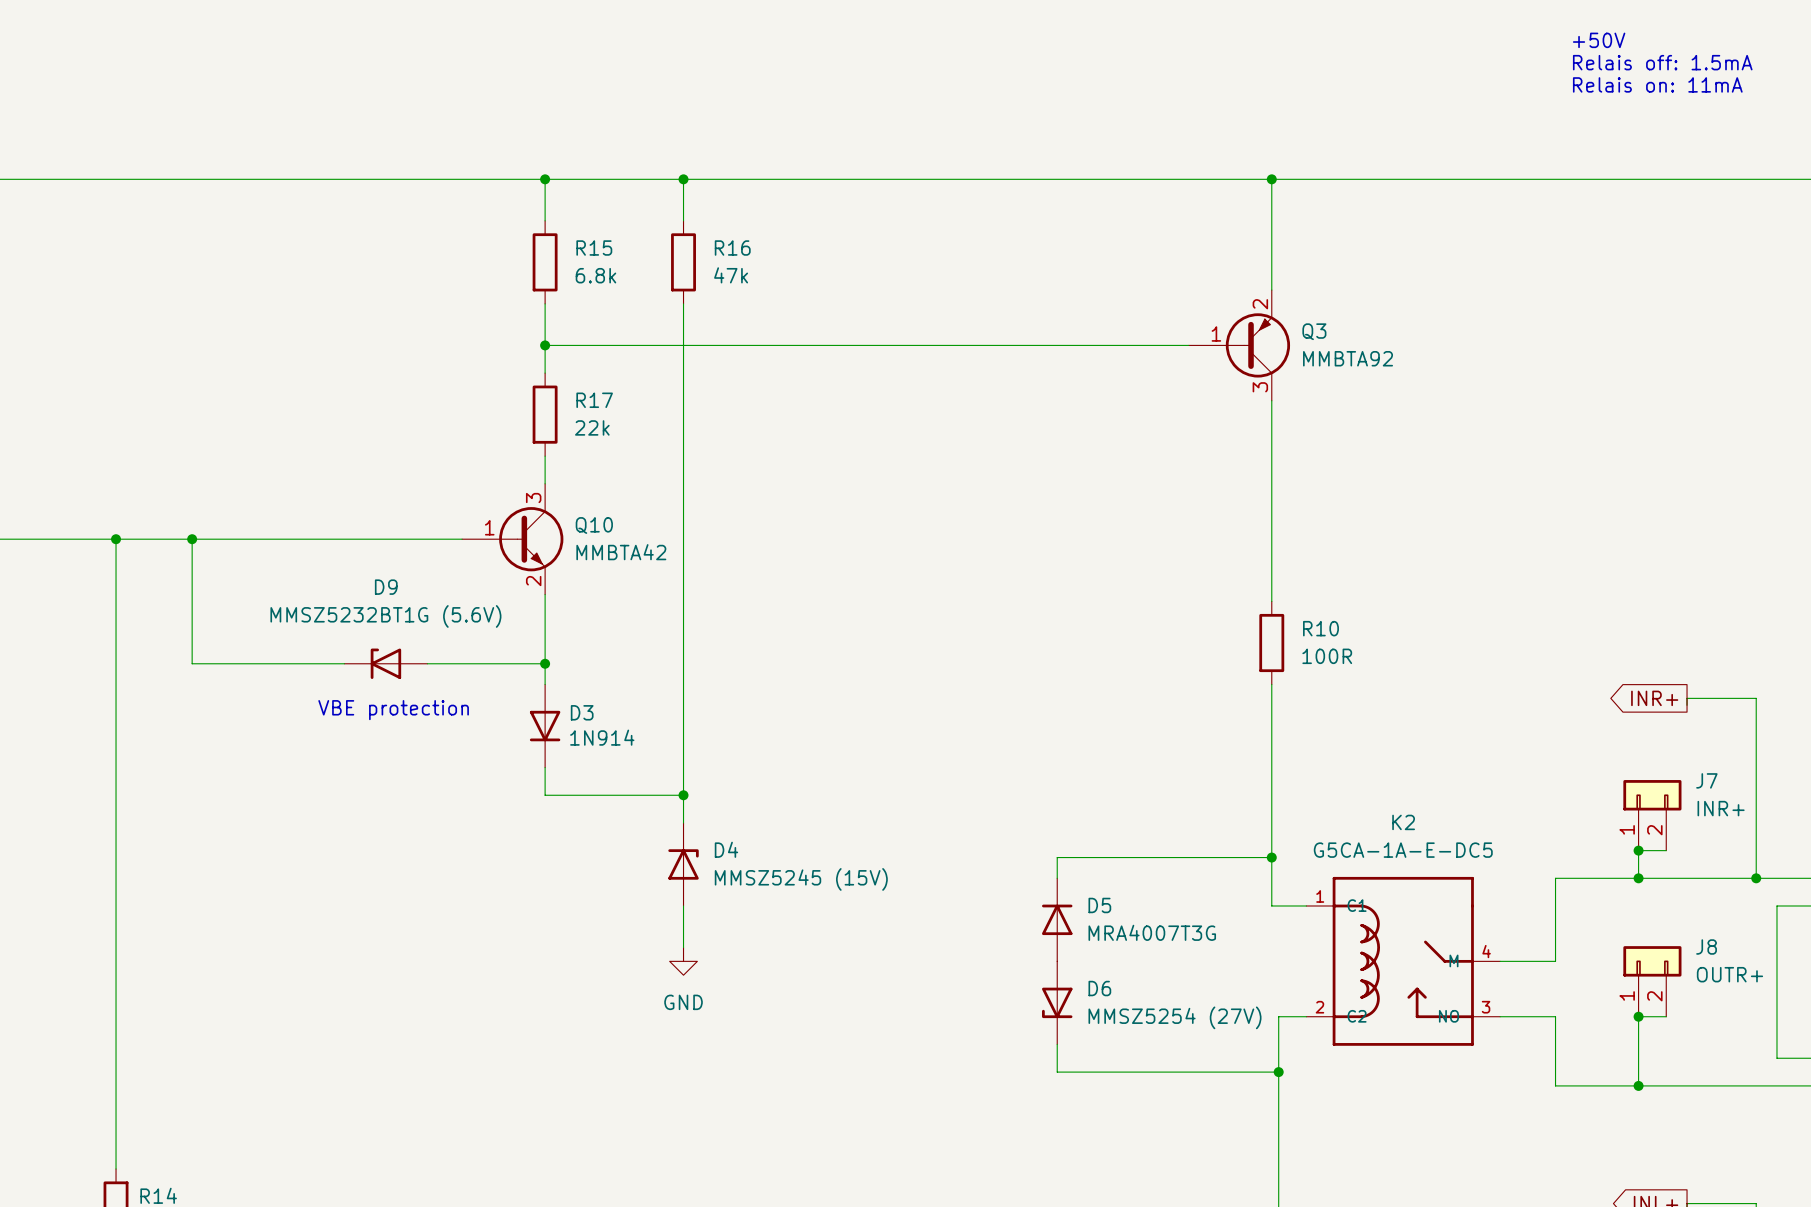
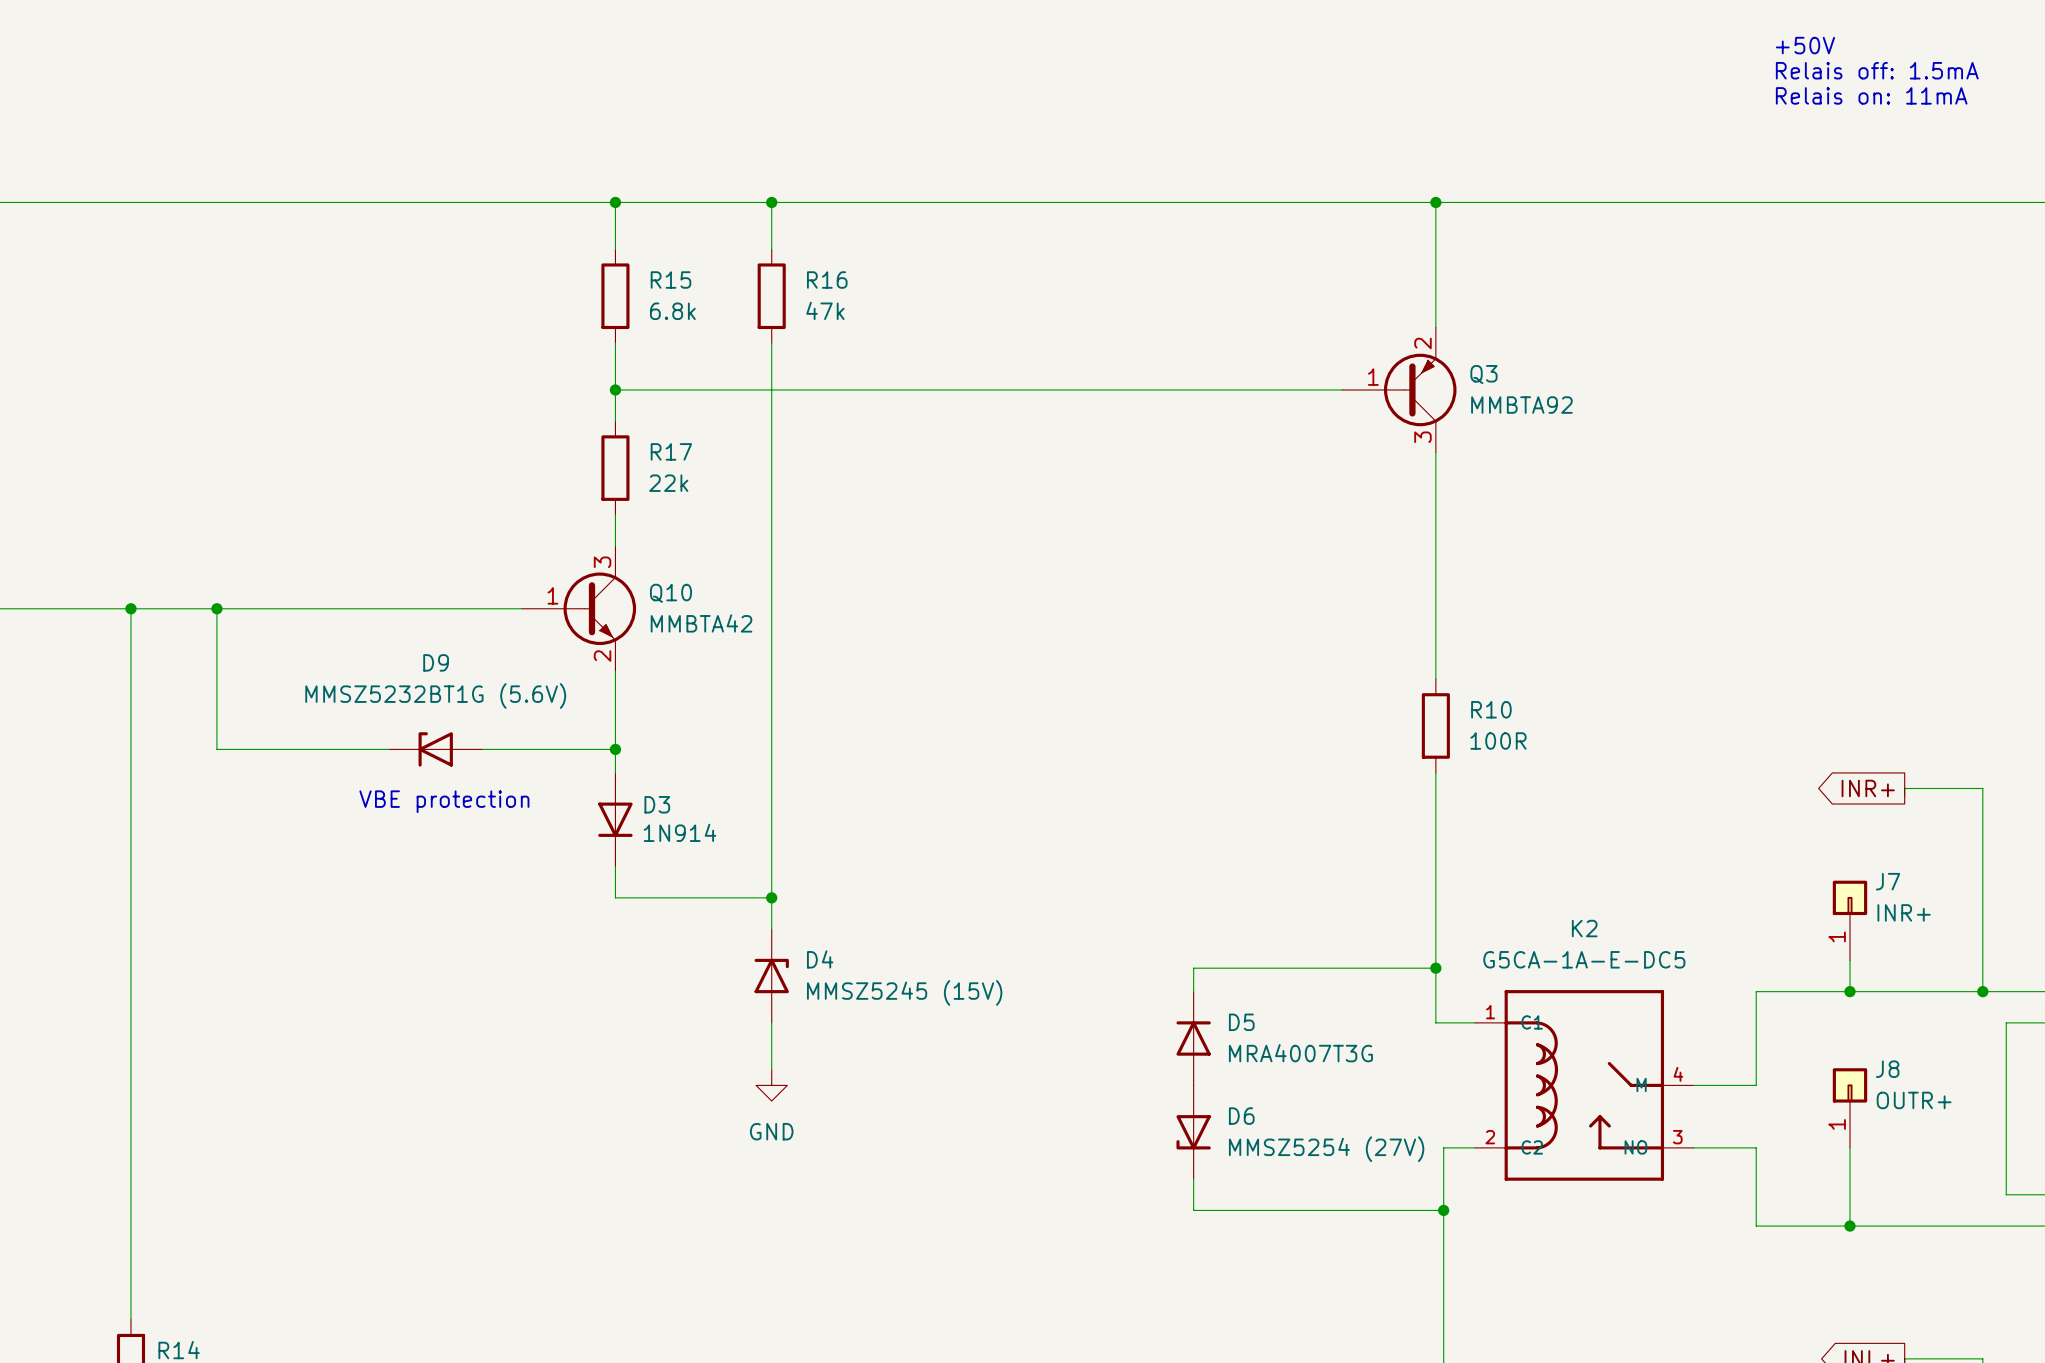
J7 symbol: [1623, 780, 1682, 851] -> [1832, 880, 1868, 961]
wire: (1638, 850) (1666, 850) -> none
junction: (1638, 850) -> none
J8 symbol: [1623, 946, 1682, 1017] -> [1832, 1068, 1868, 1148]
wire: (1638, 1016) (1666, 1016) -> none
junction: (1638, 1016) -> none

